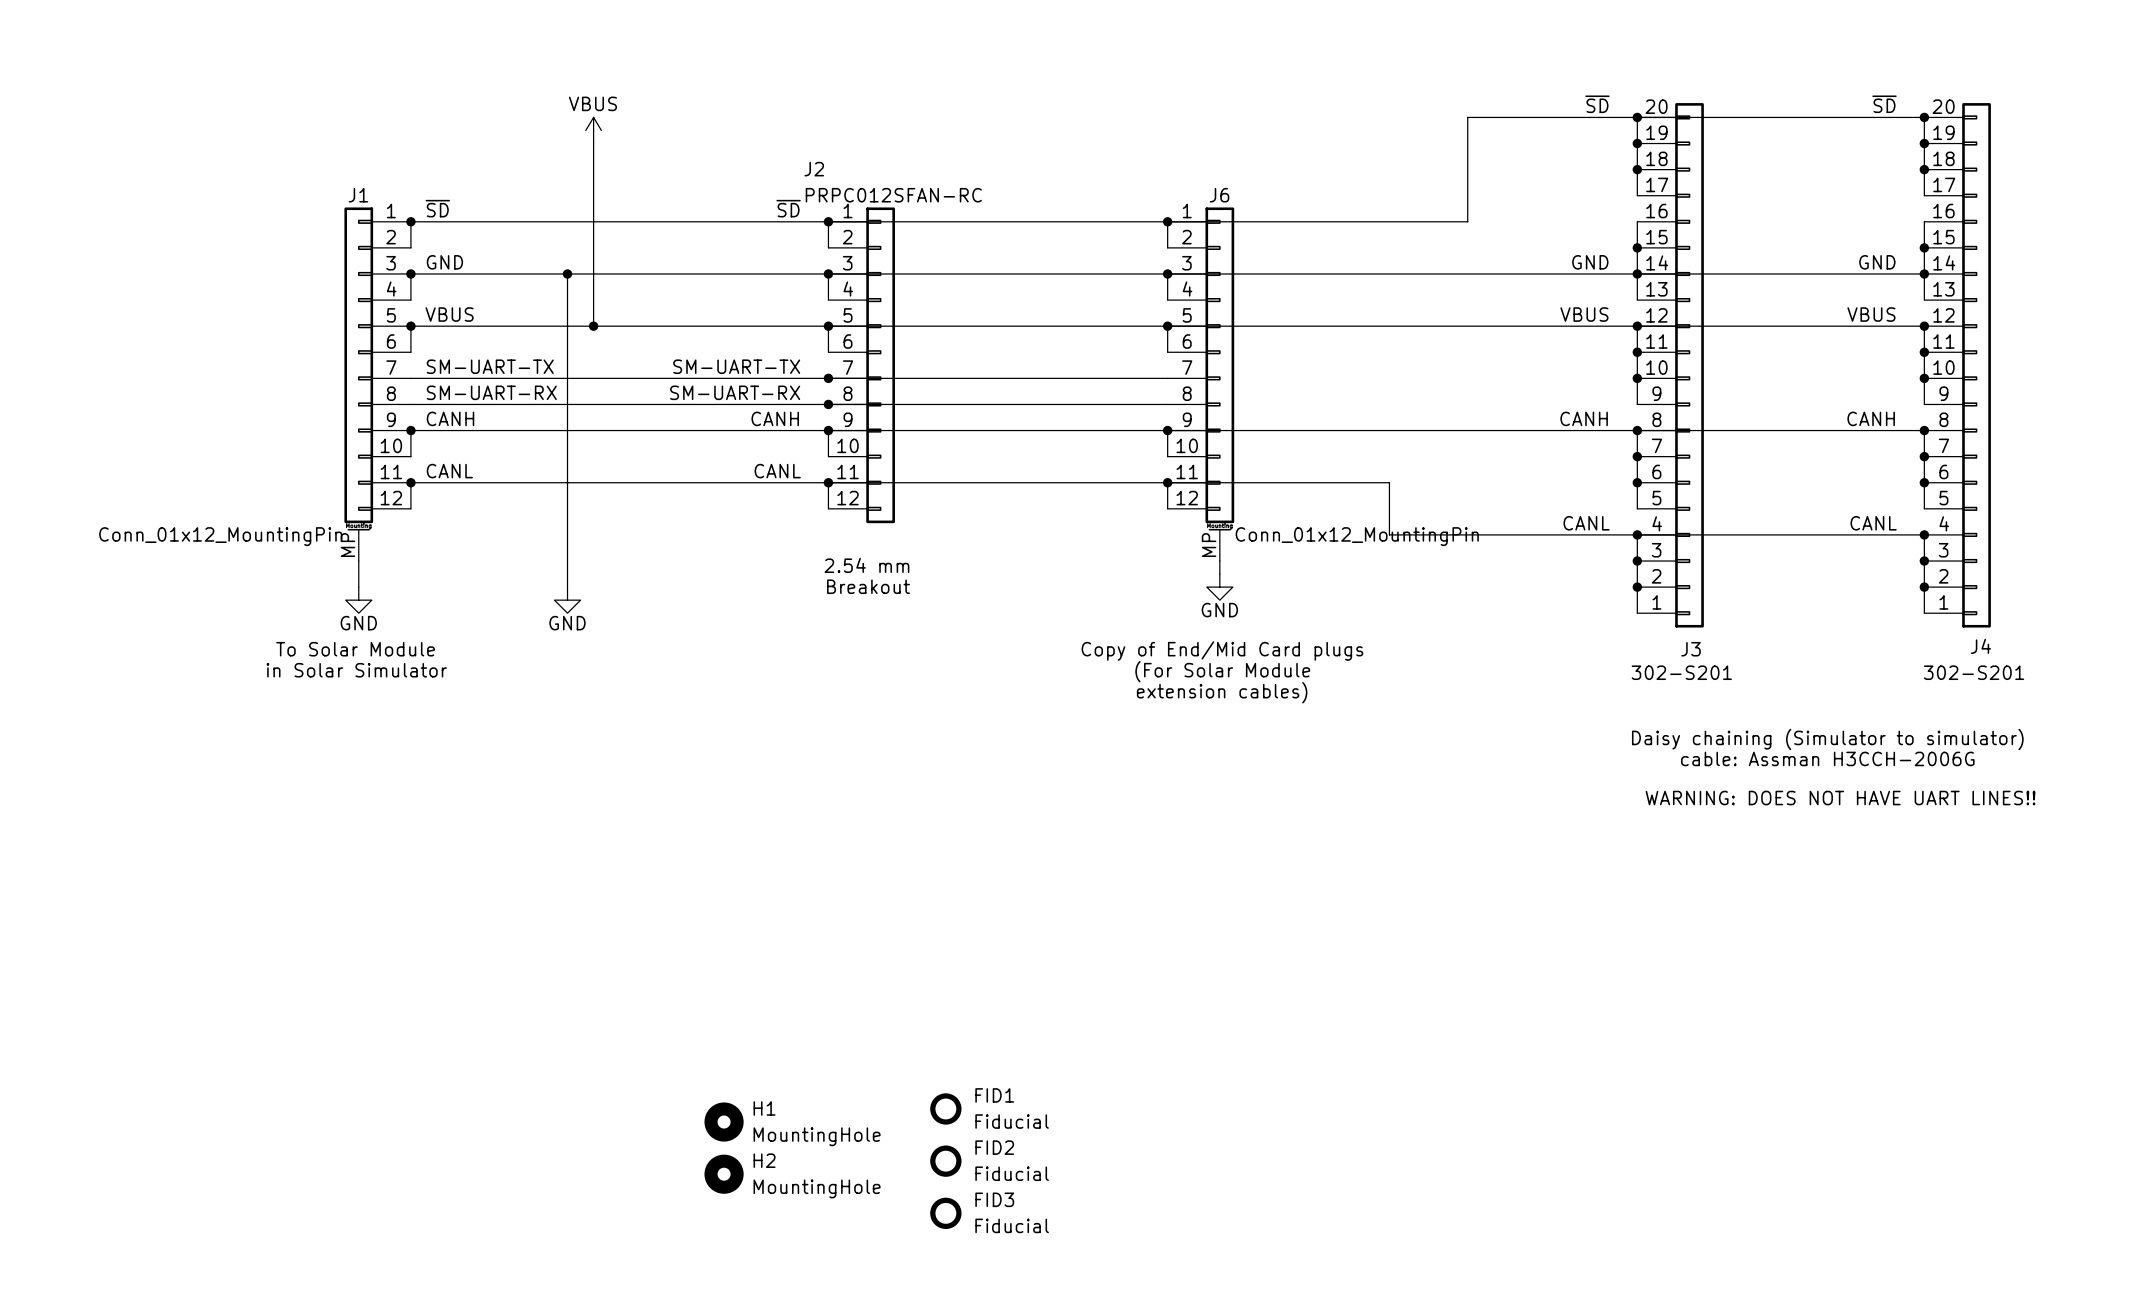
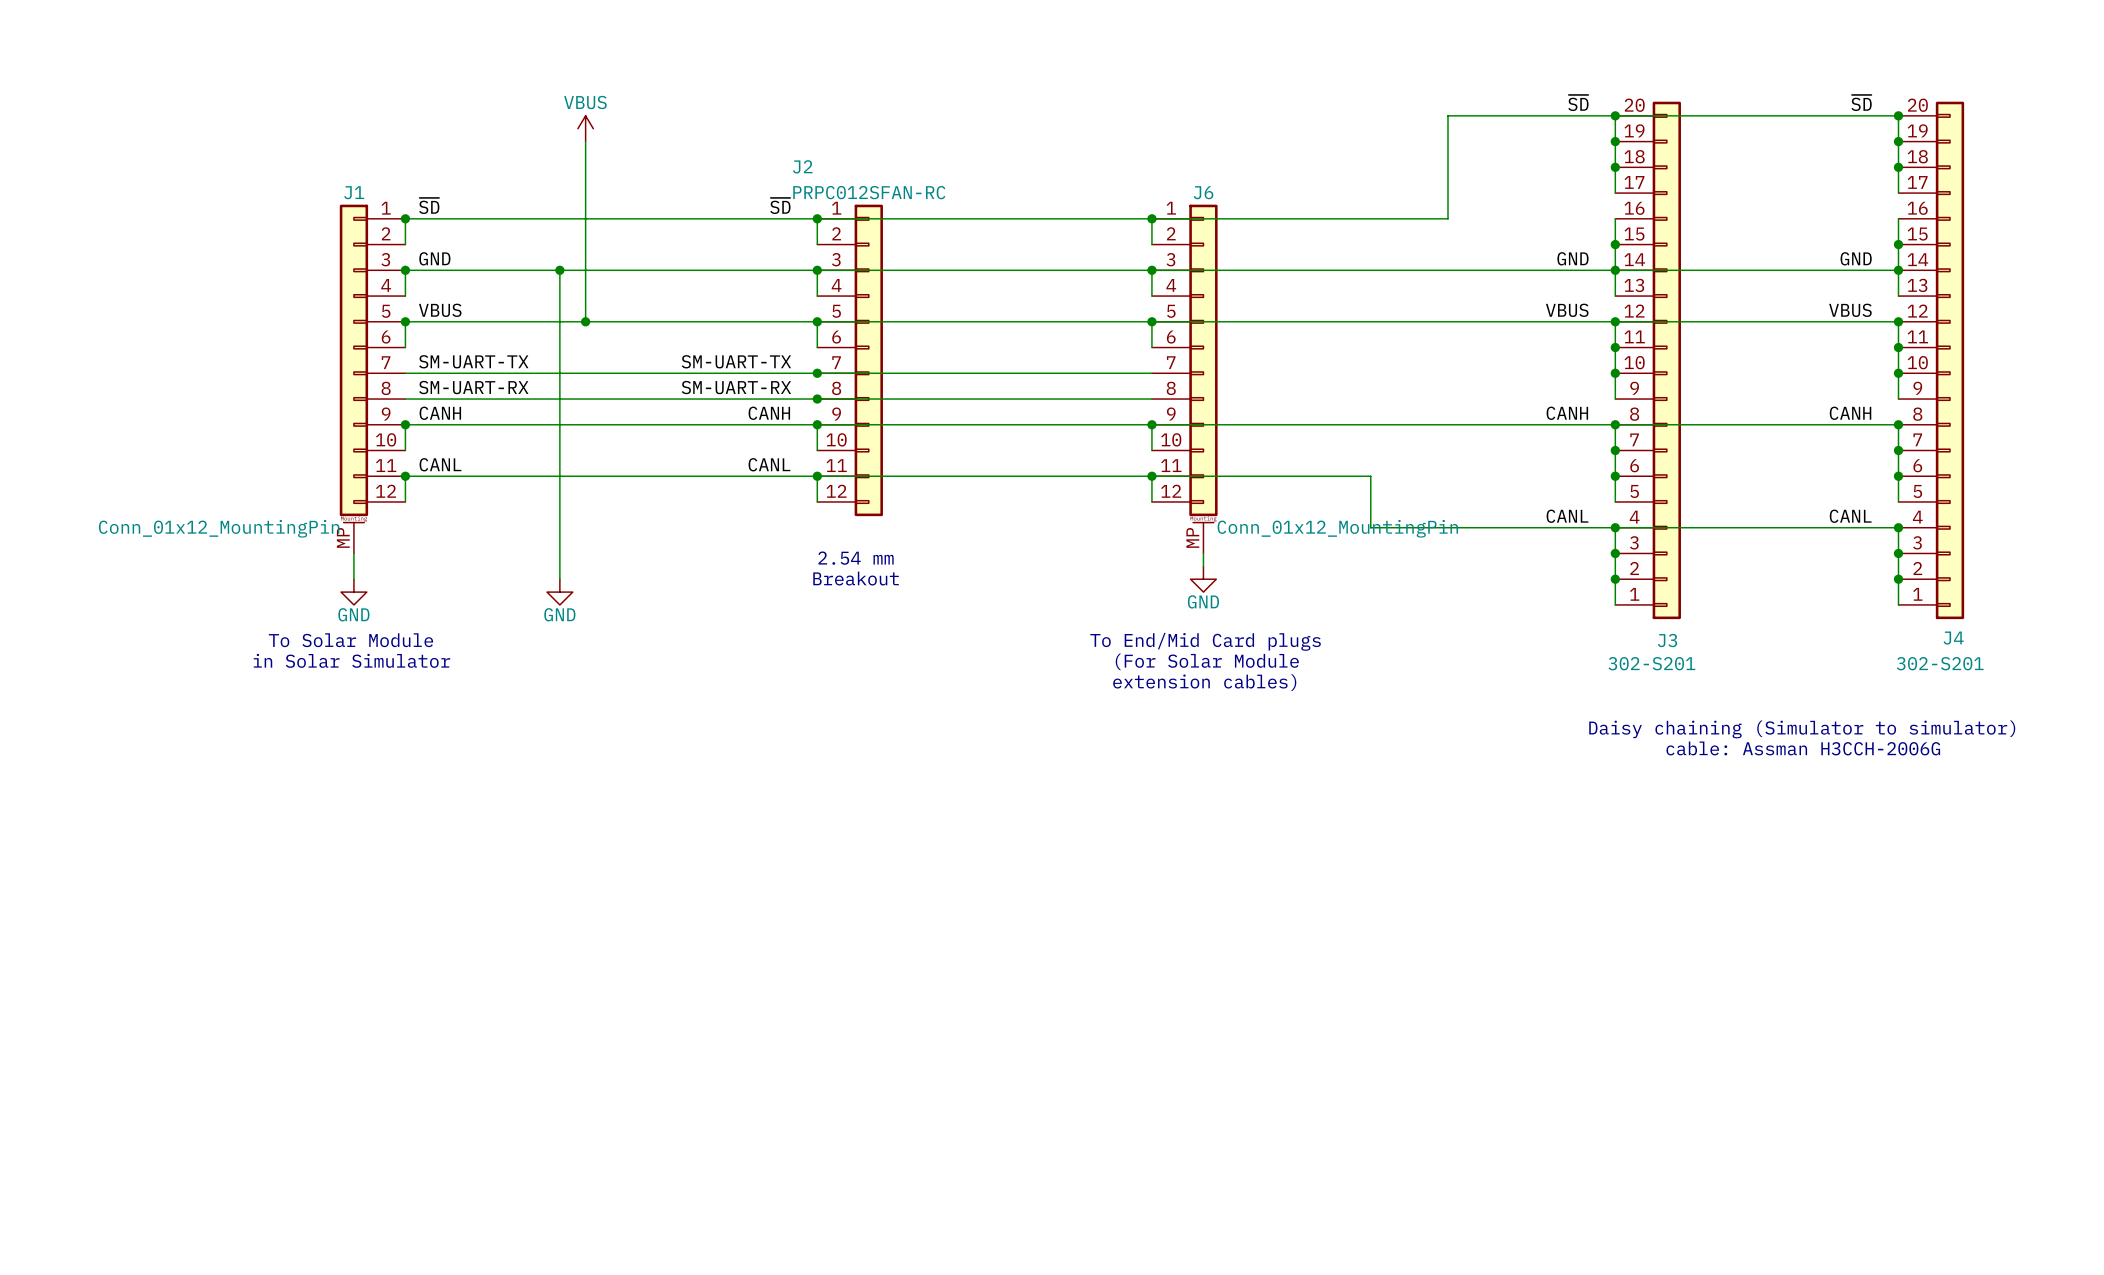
text: Copy of End/Mid Card plugs (1222, 651) -> To End/Mid Card plugs (1205, 641)
text: WARNING: DOES NOT HAVE UART LINES!! (1840, 798) -> none
FID1: Fiducial (945, 1108) -> none
H1: MountingHole (724, 1122) -> none
FID2: Fiducial (945, 1161) -> none
H2: MountingHole (724, 1174) -> none
FID3: Fiducial (945, 1213) -> none

